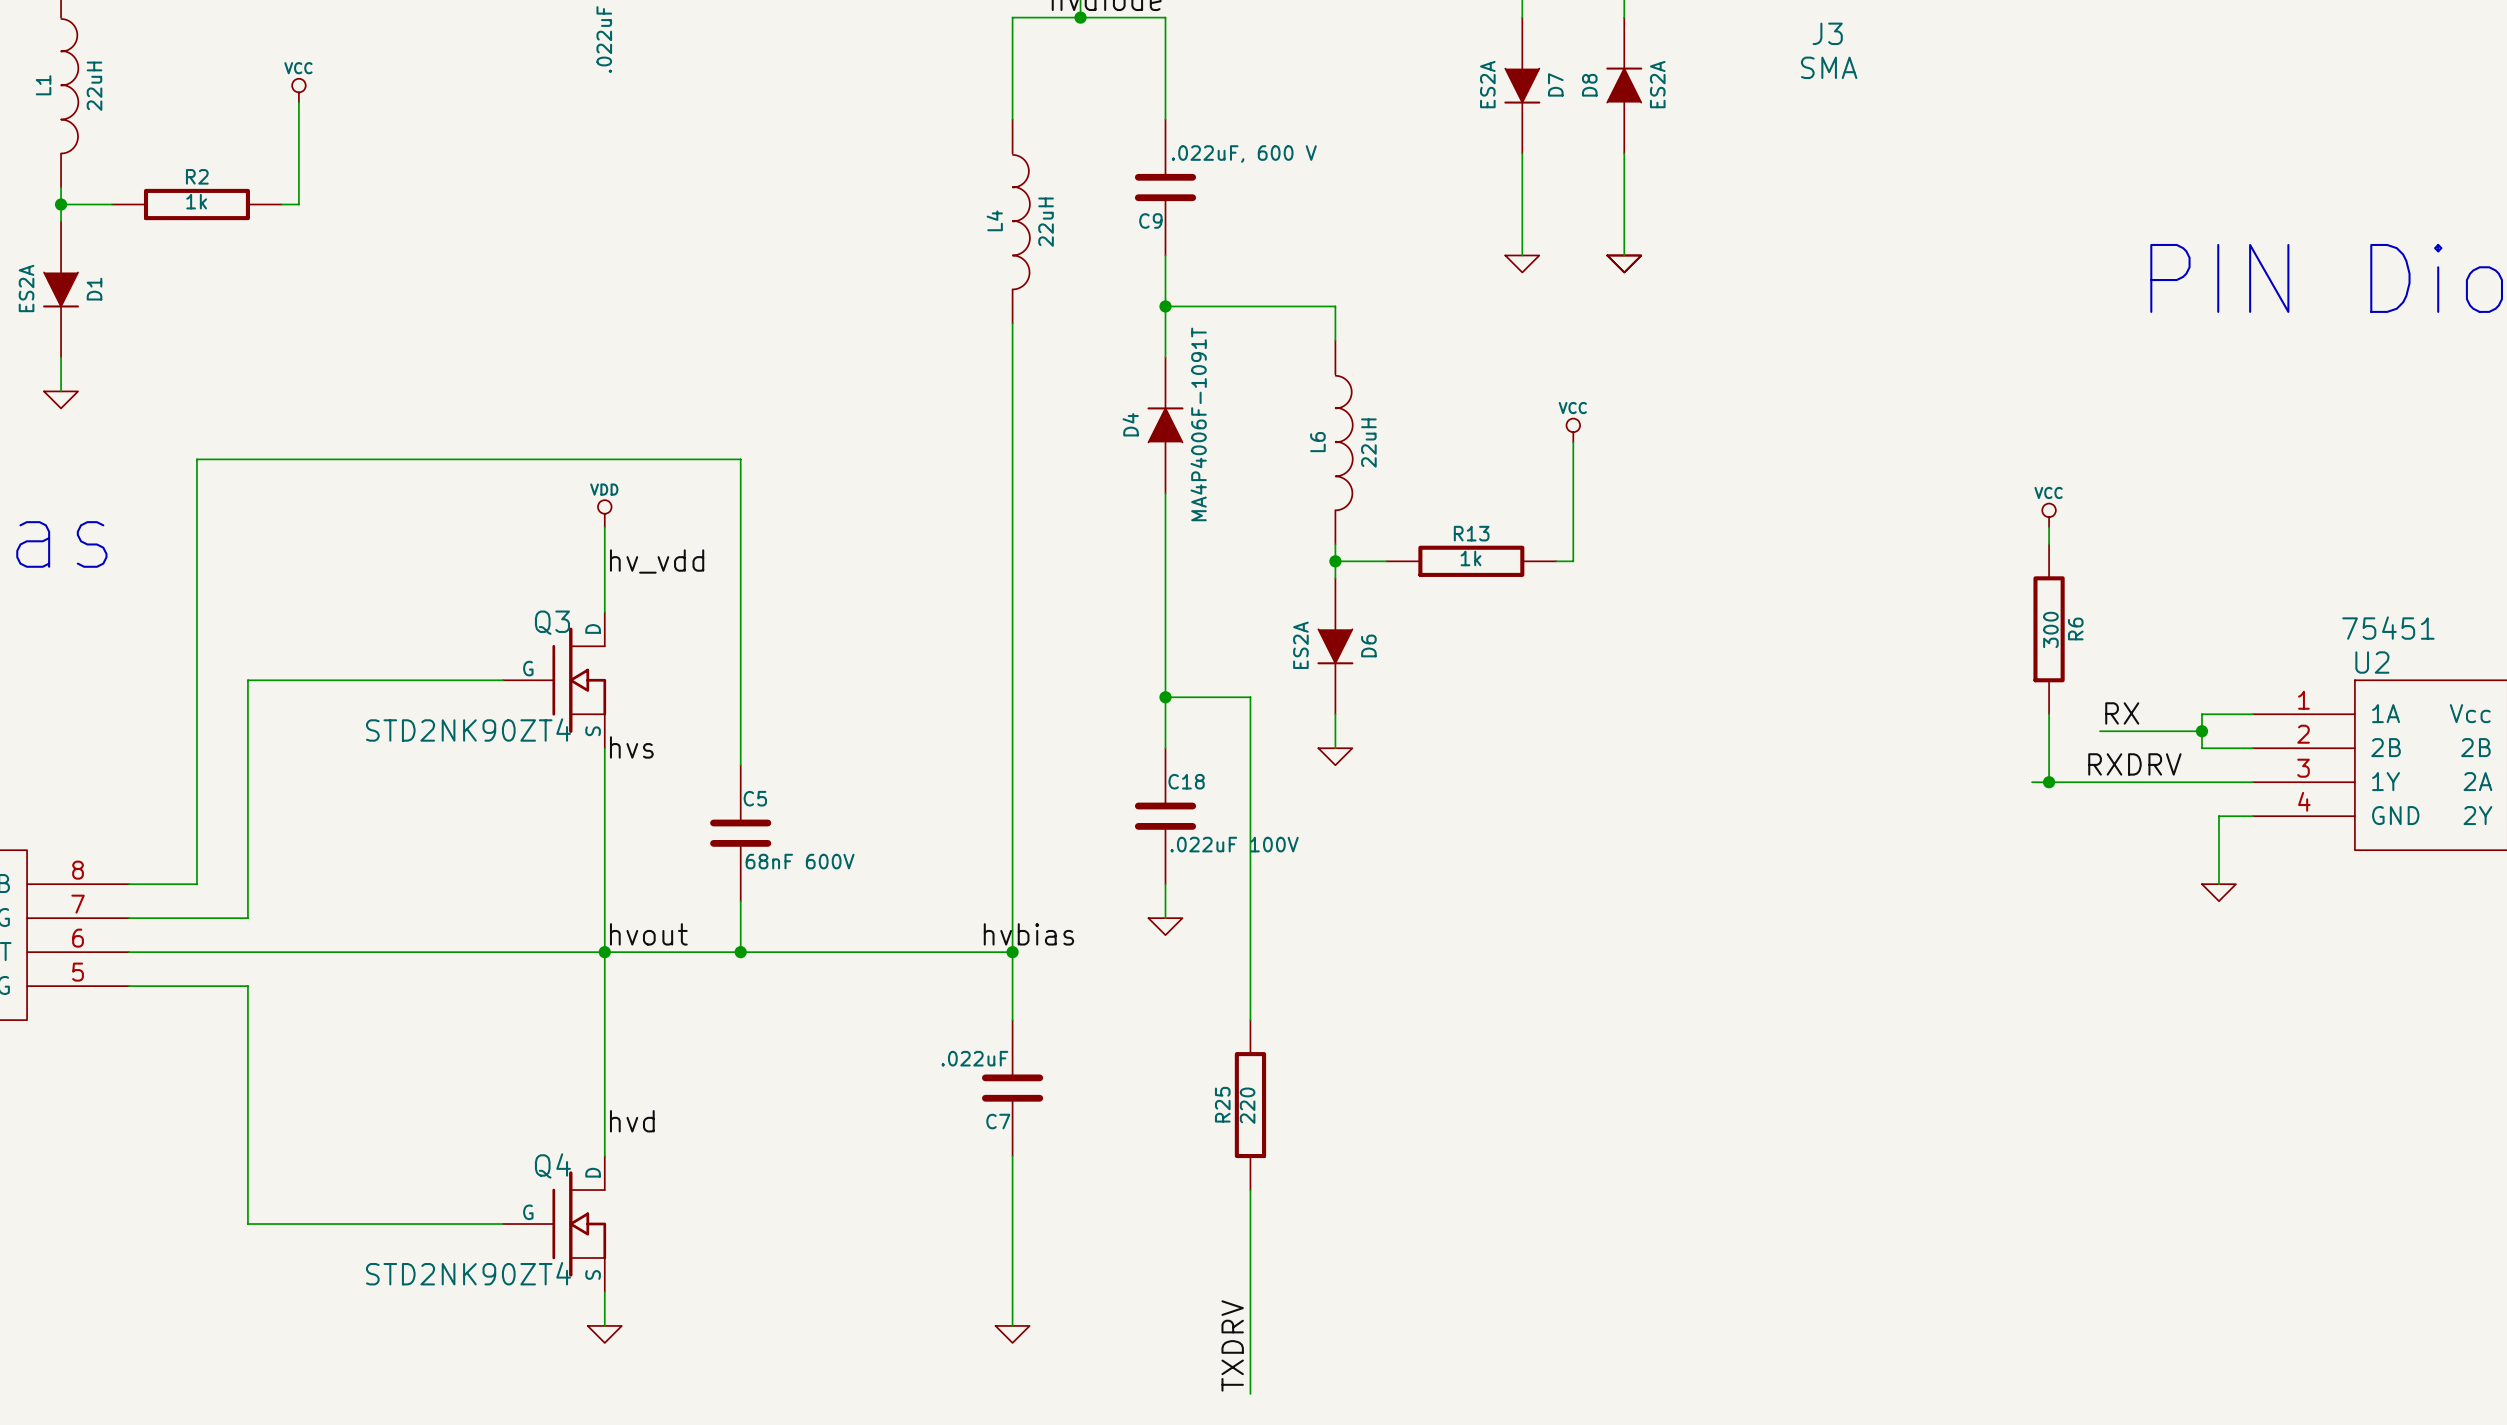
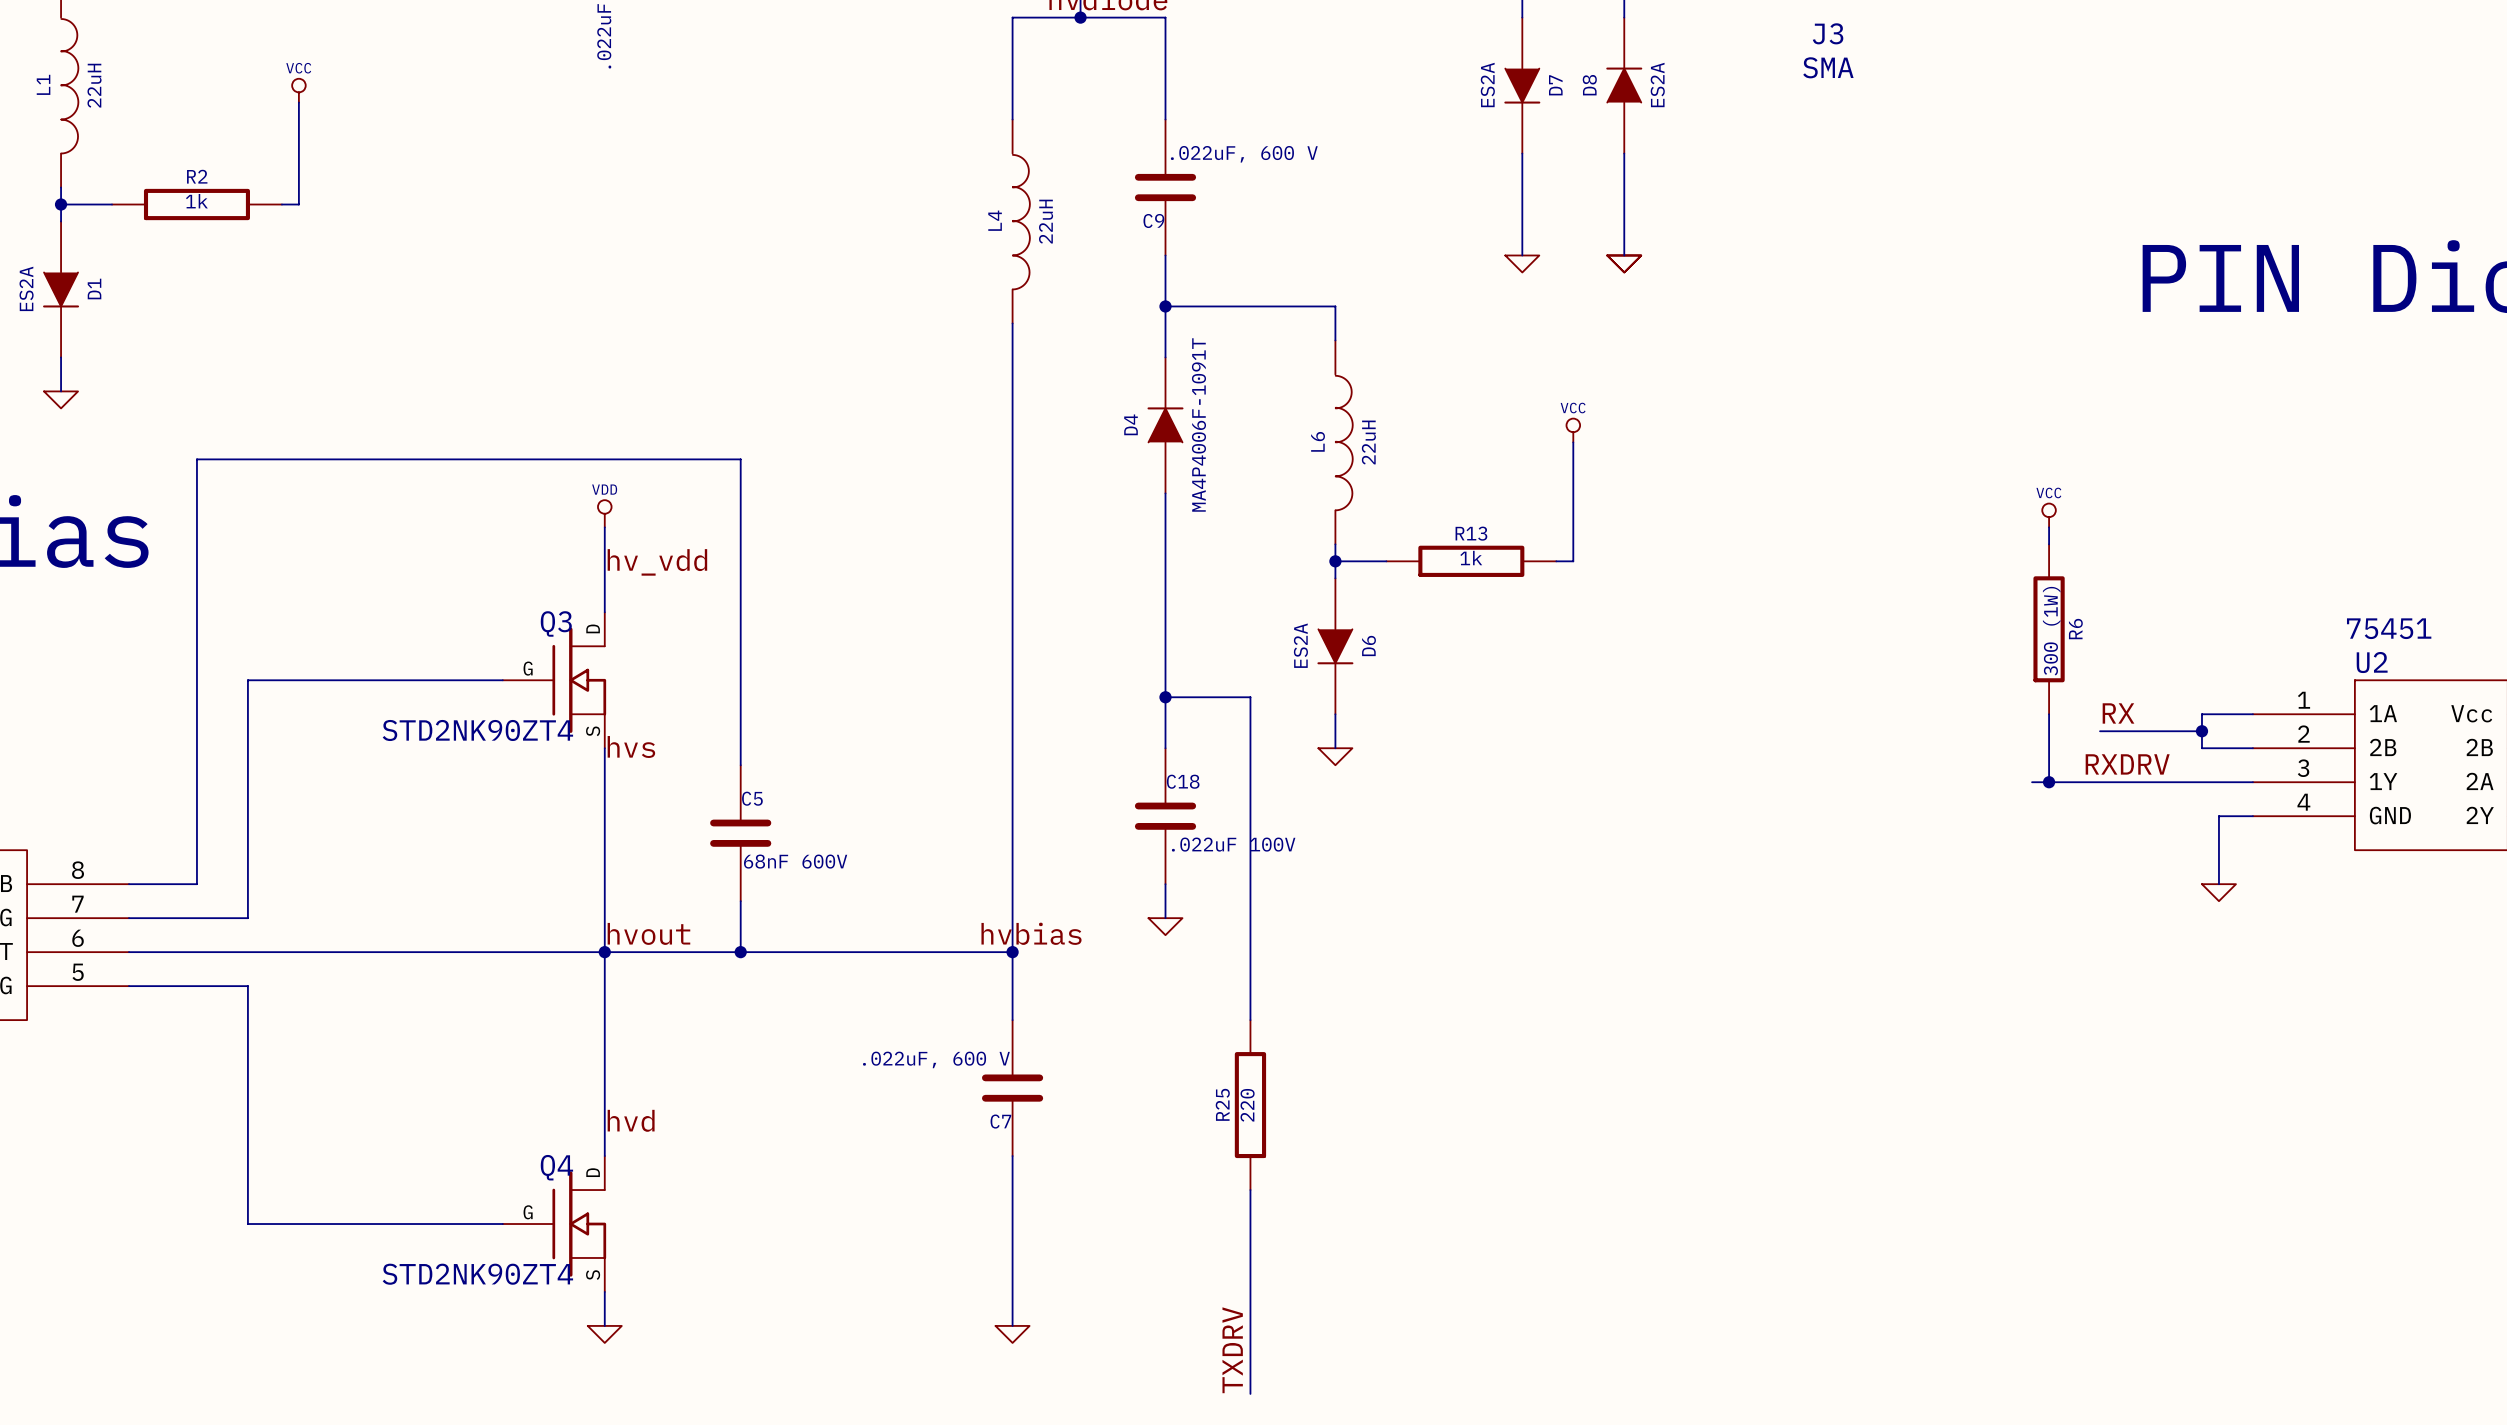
R6 value: 300 (2050, 629) -> 300 (1W) (2051, 631)
C7 value: .022uF (974, 1058) -> .022uF, 600 V (936, 1059)

